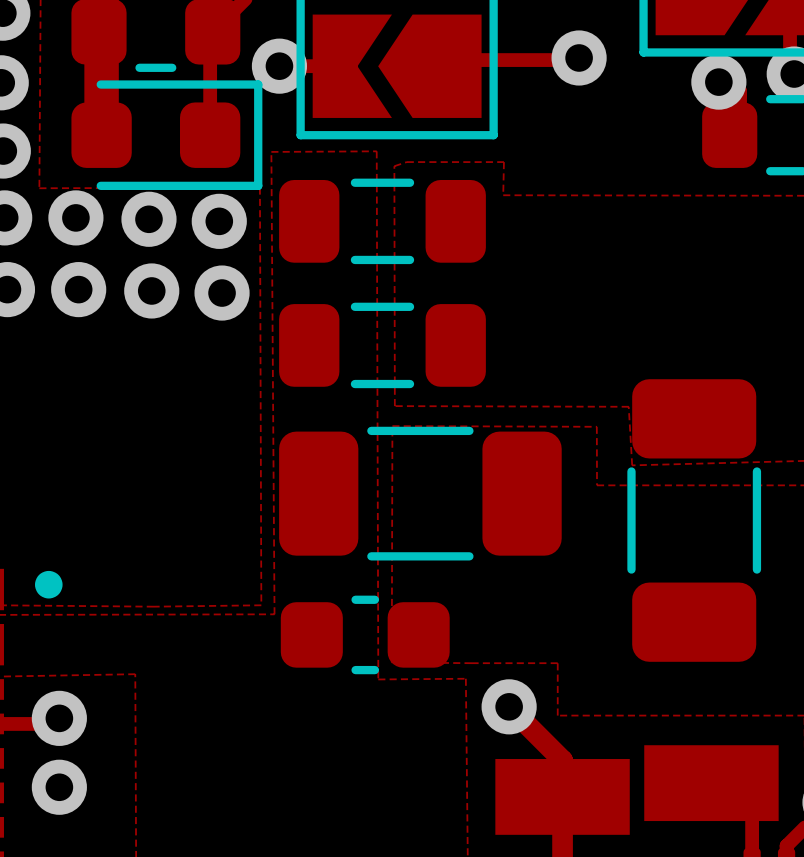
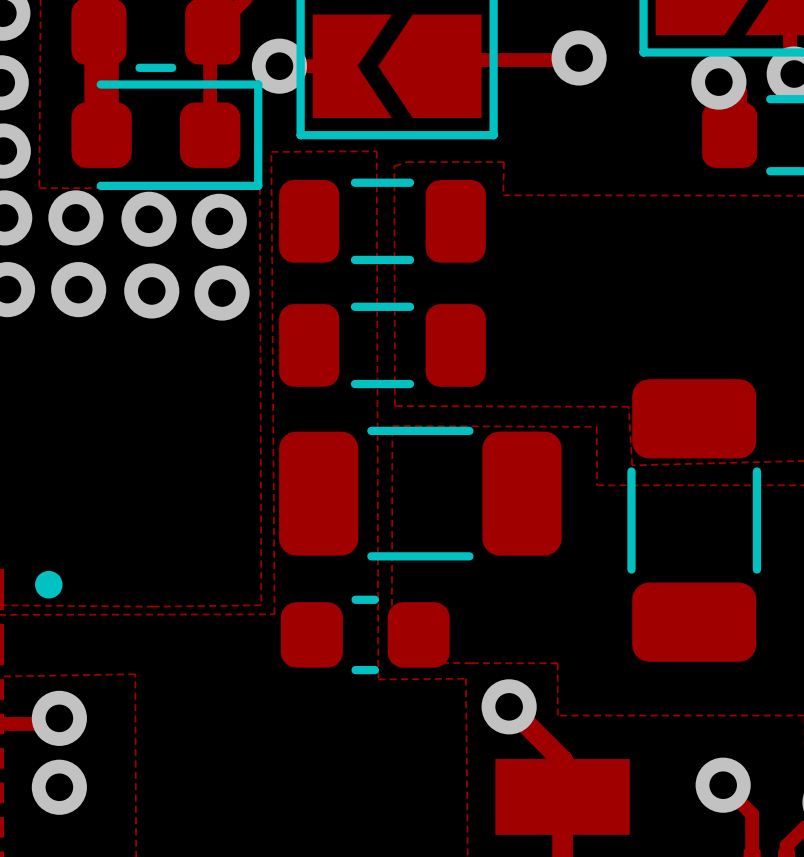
part: (711, 783) -> none
via: none -> (723, 785)

